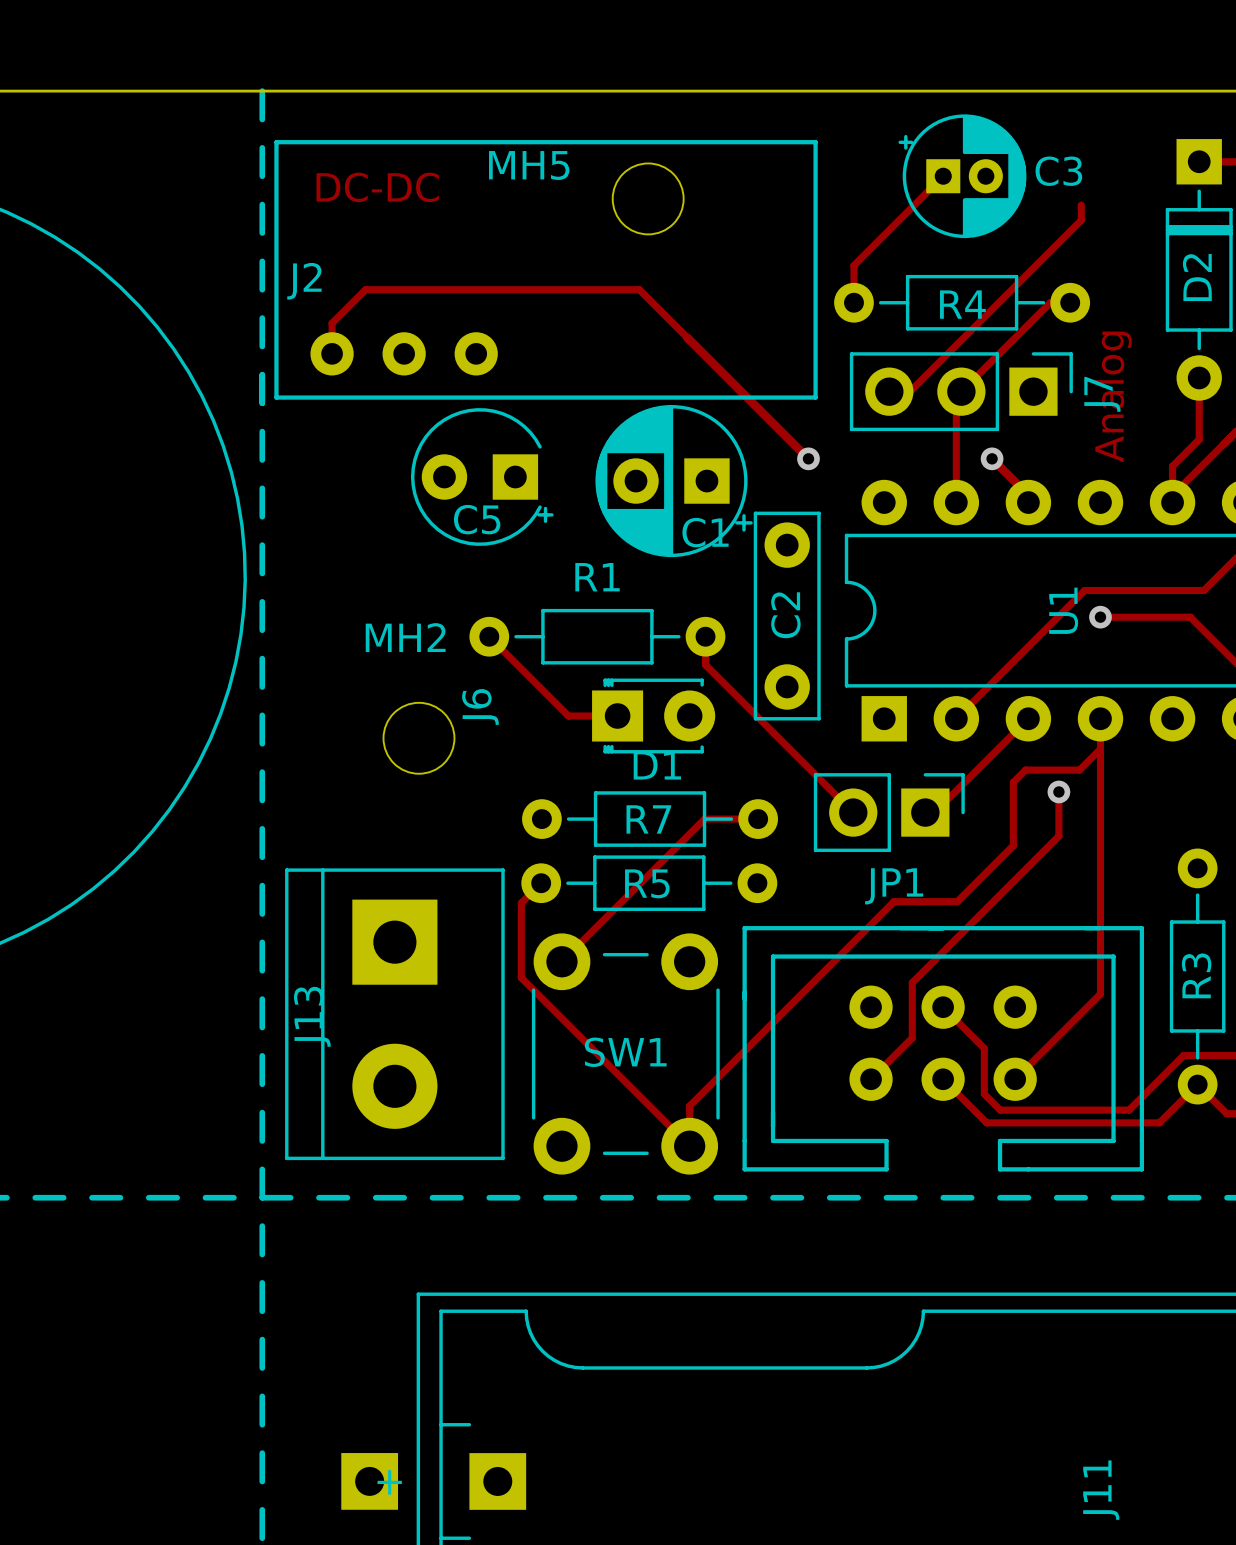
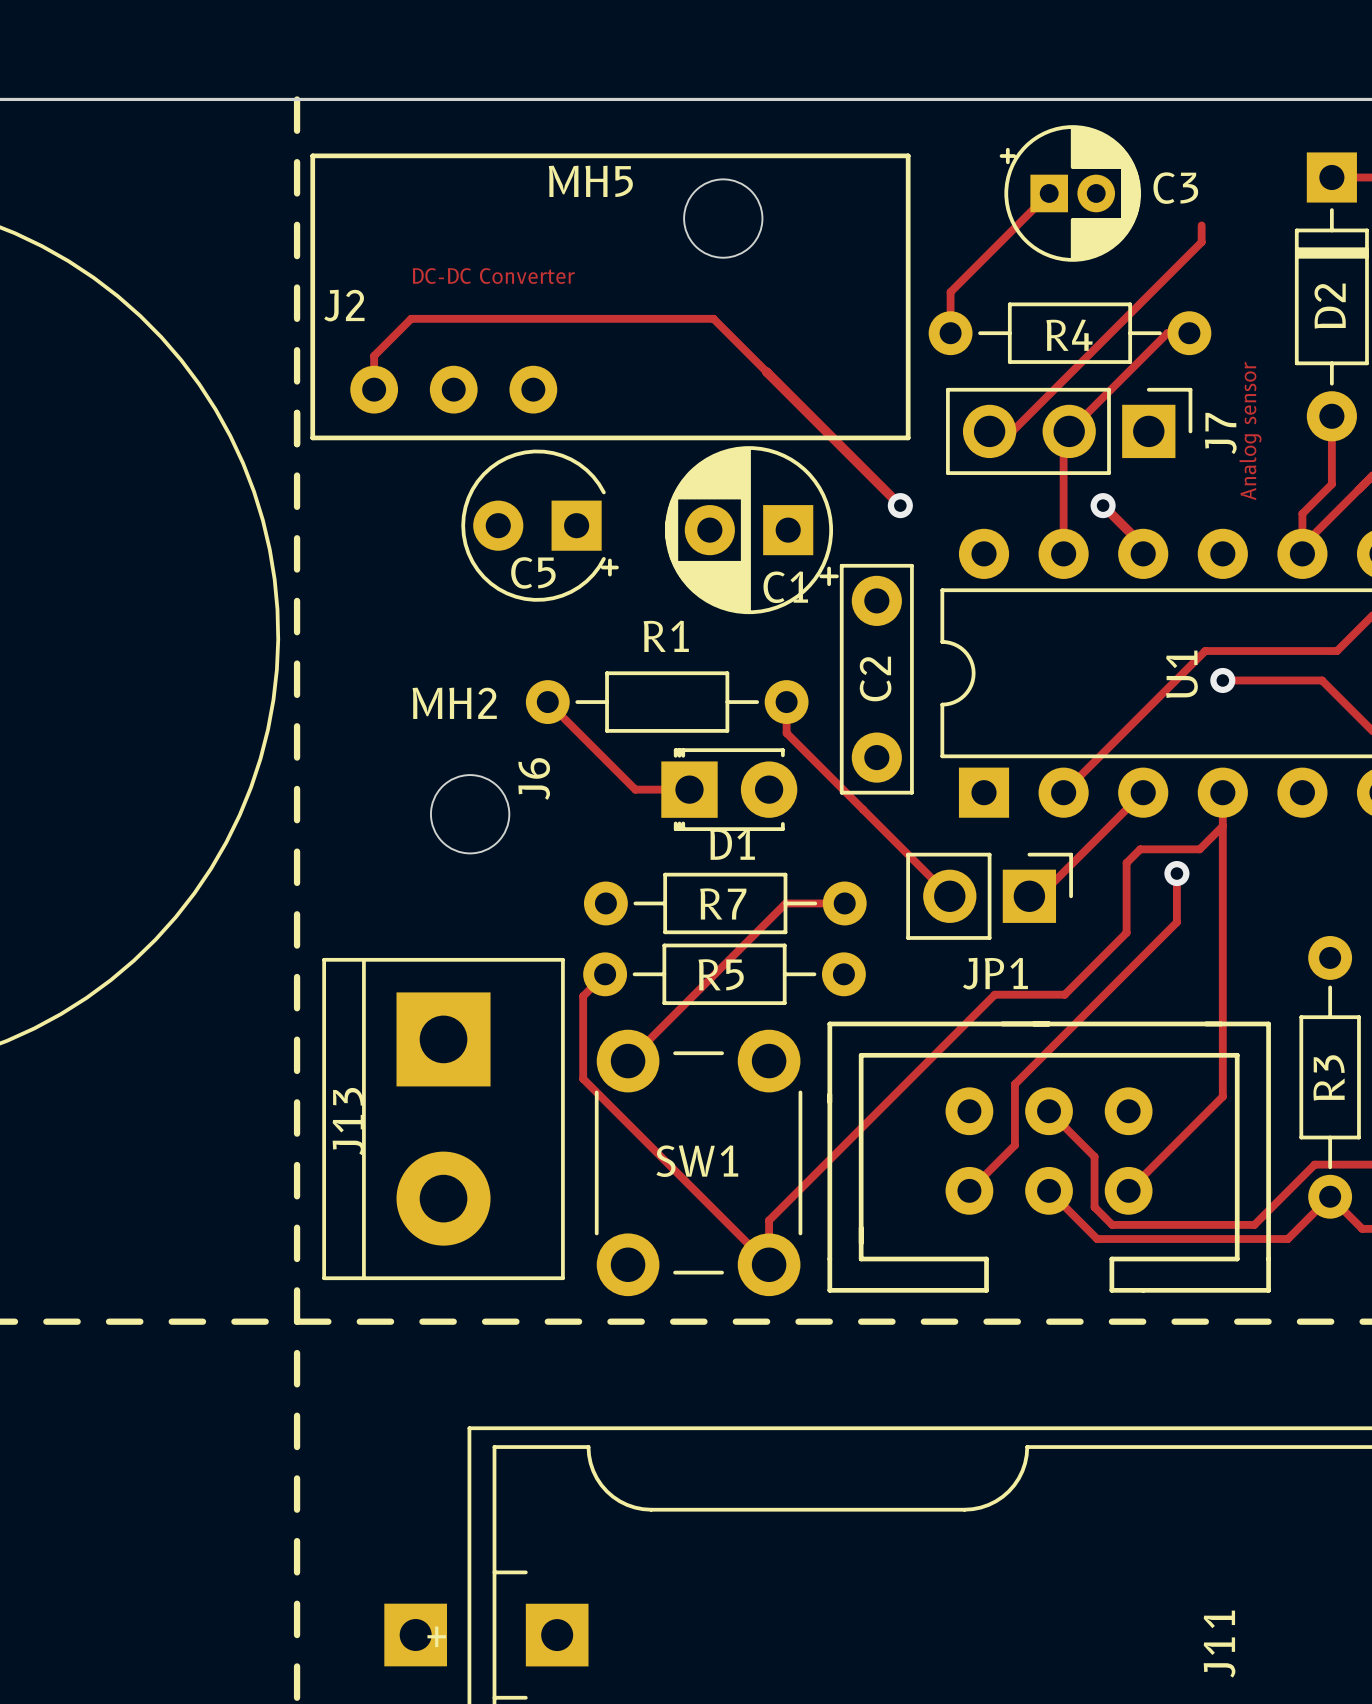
text: DC-DC (377, 187) -> none
text: none -> DC-DC Converter (493, 276)
text: Analog (1112, 396) -> Analog sensor (1250, 431)

